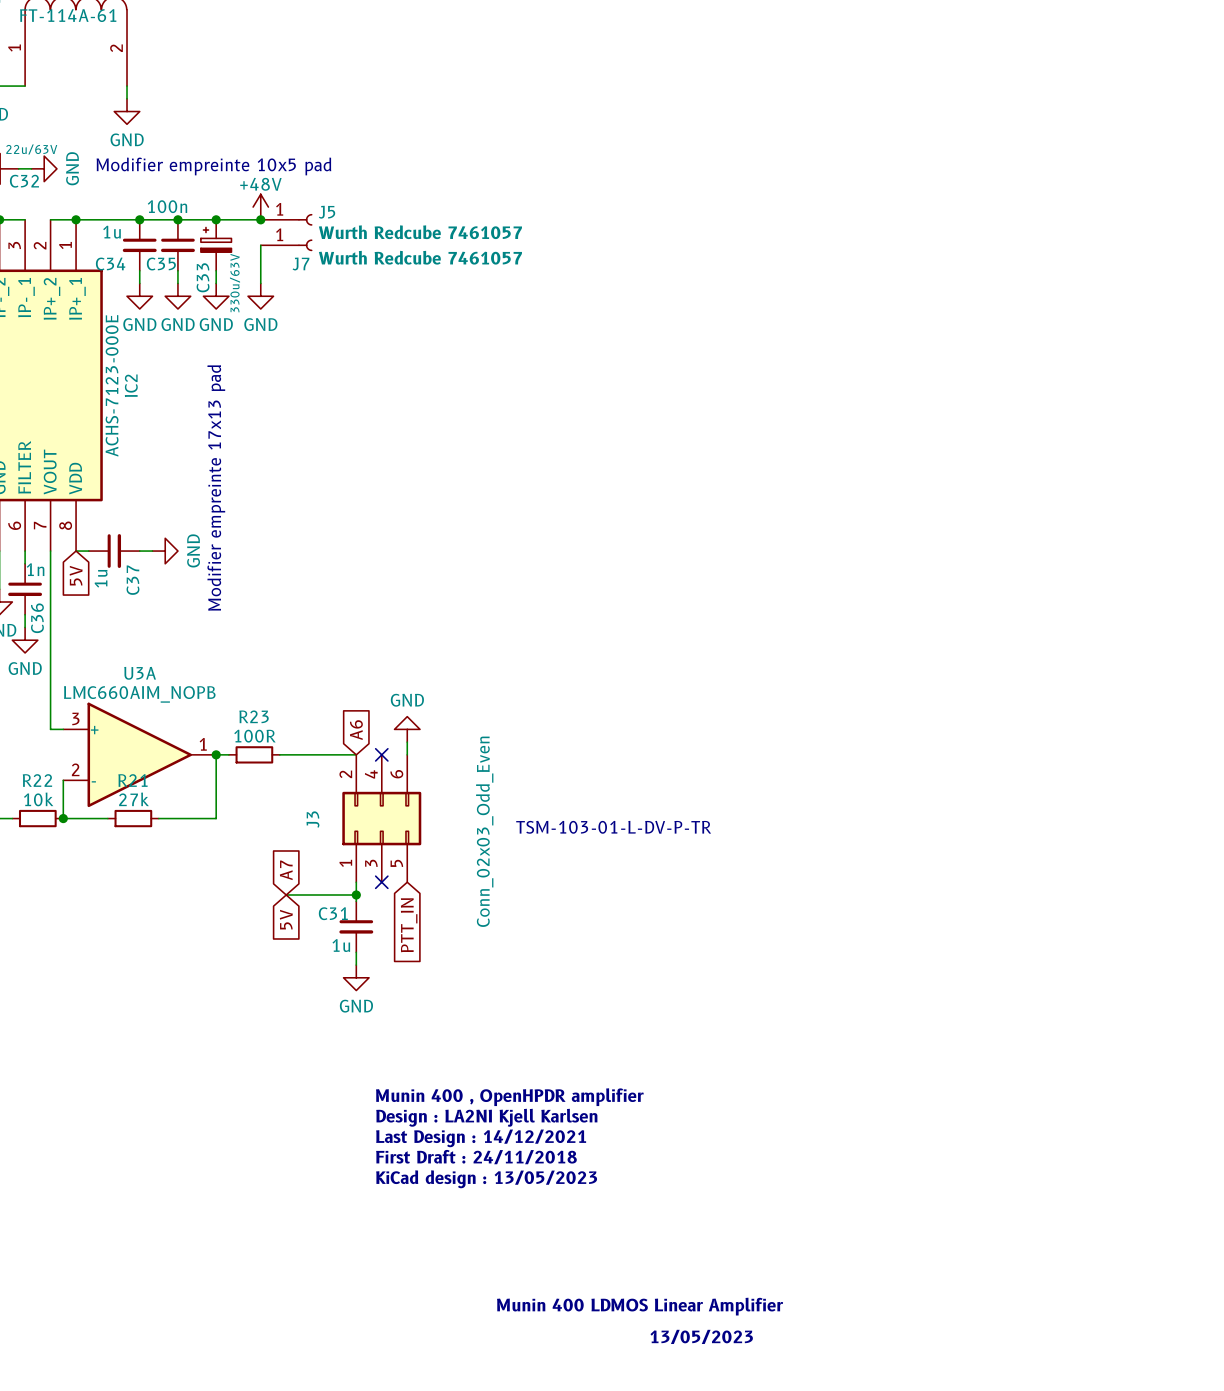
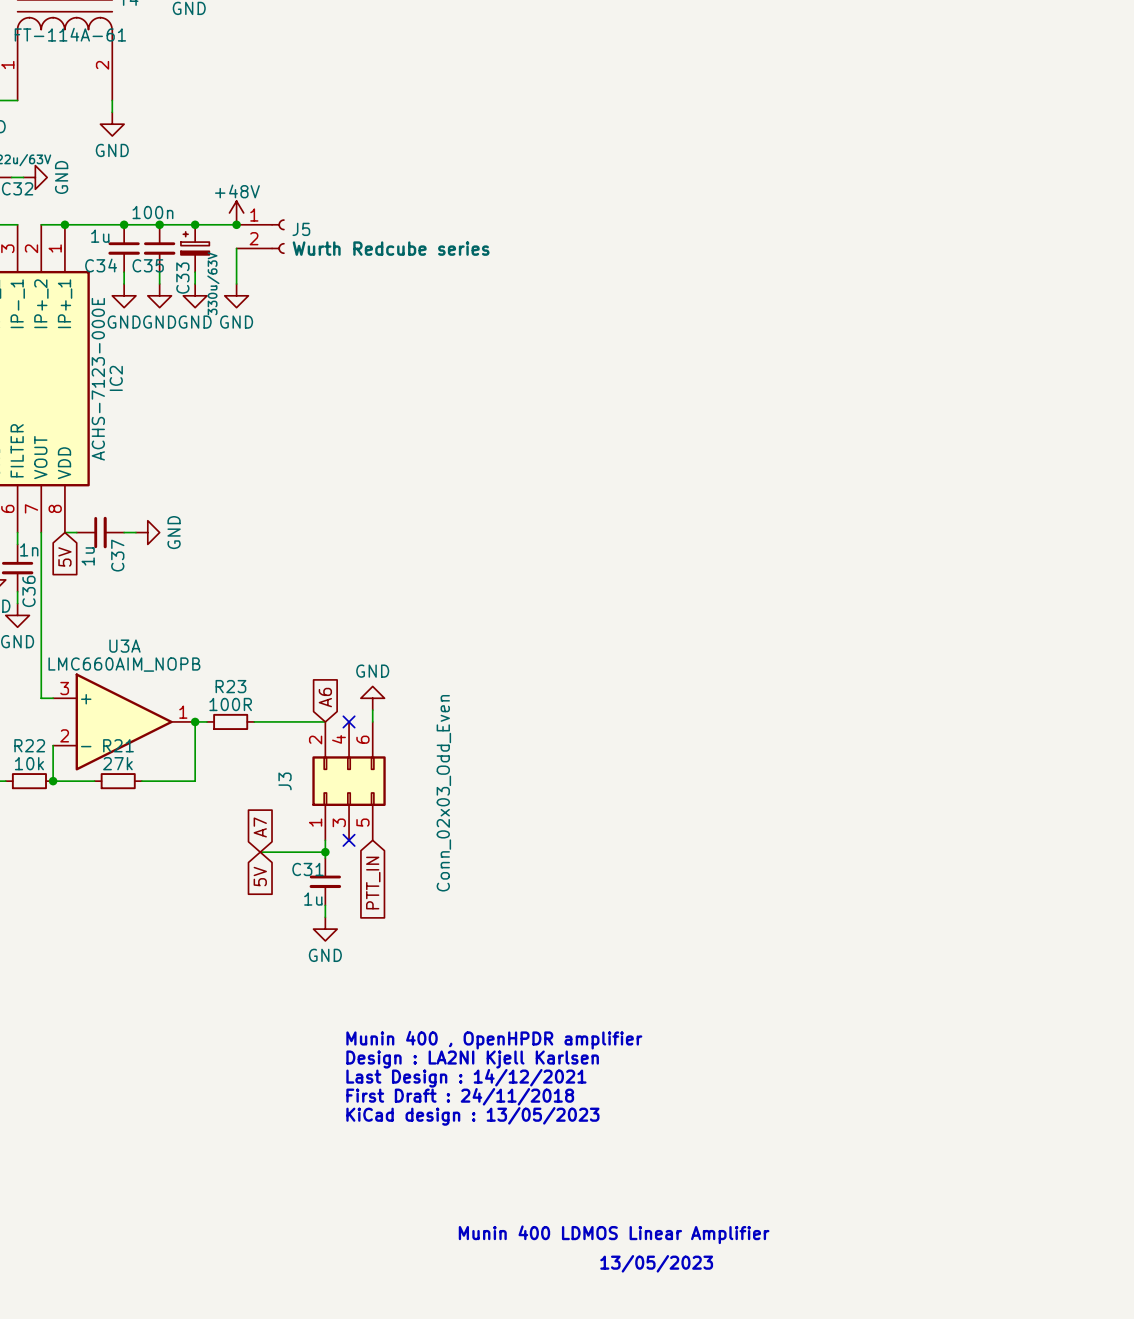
text: Modifier empreinte 10x5 pad (213, 166) -> none
J5 symbol: [260, 213, 313, 226] -> [236, 219, 285, 254]
J5 value: Wurth Redcube 7461057 (420, 232) -> Wurth Redcube series (391, 248)
J7: Wurth Redcube 7461057 (286, 245) -> none
text: Modifier empreinte 17x13 pad (216, 488) -> none
text: TSM-103-01-L-DV-P-TR (613, 827) -> none

